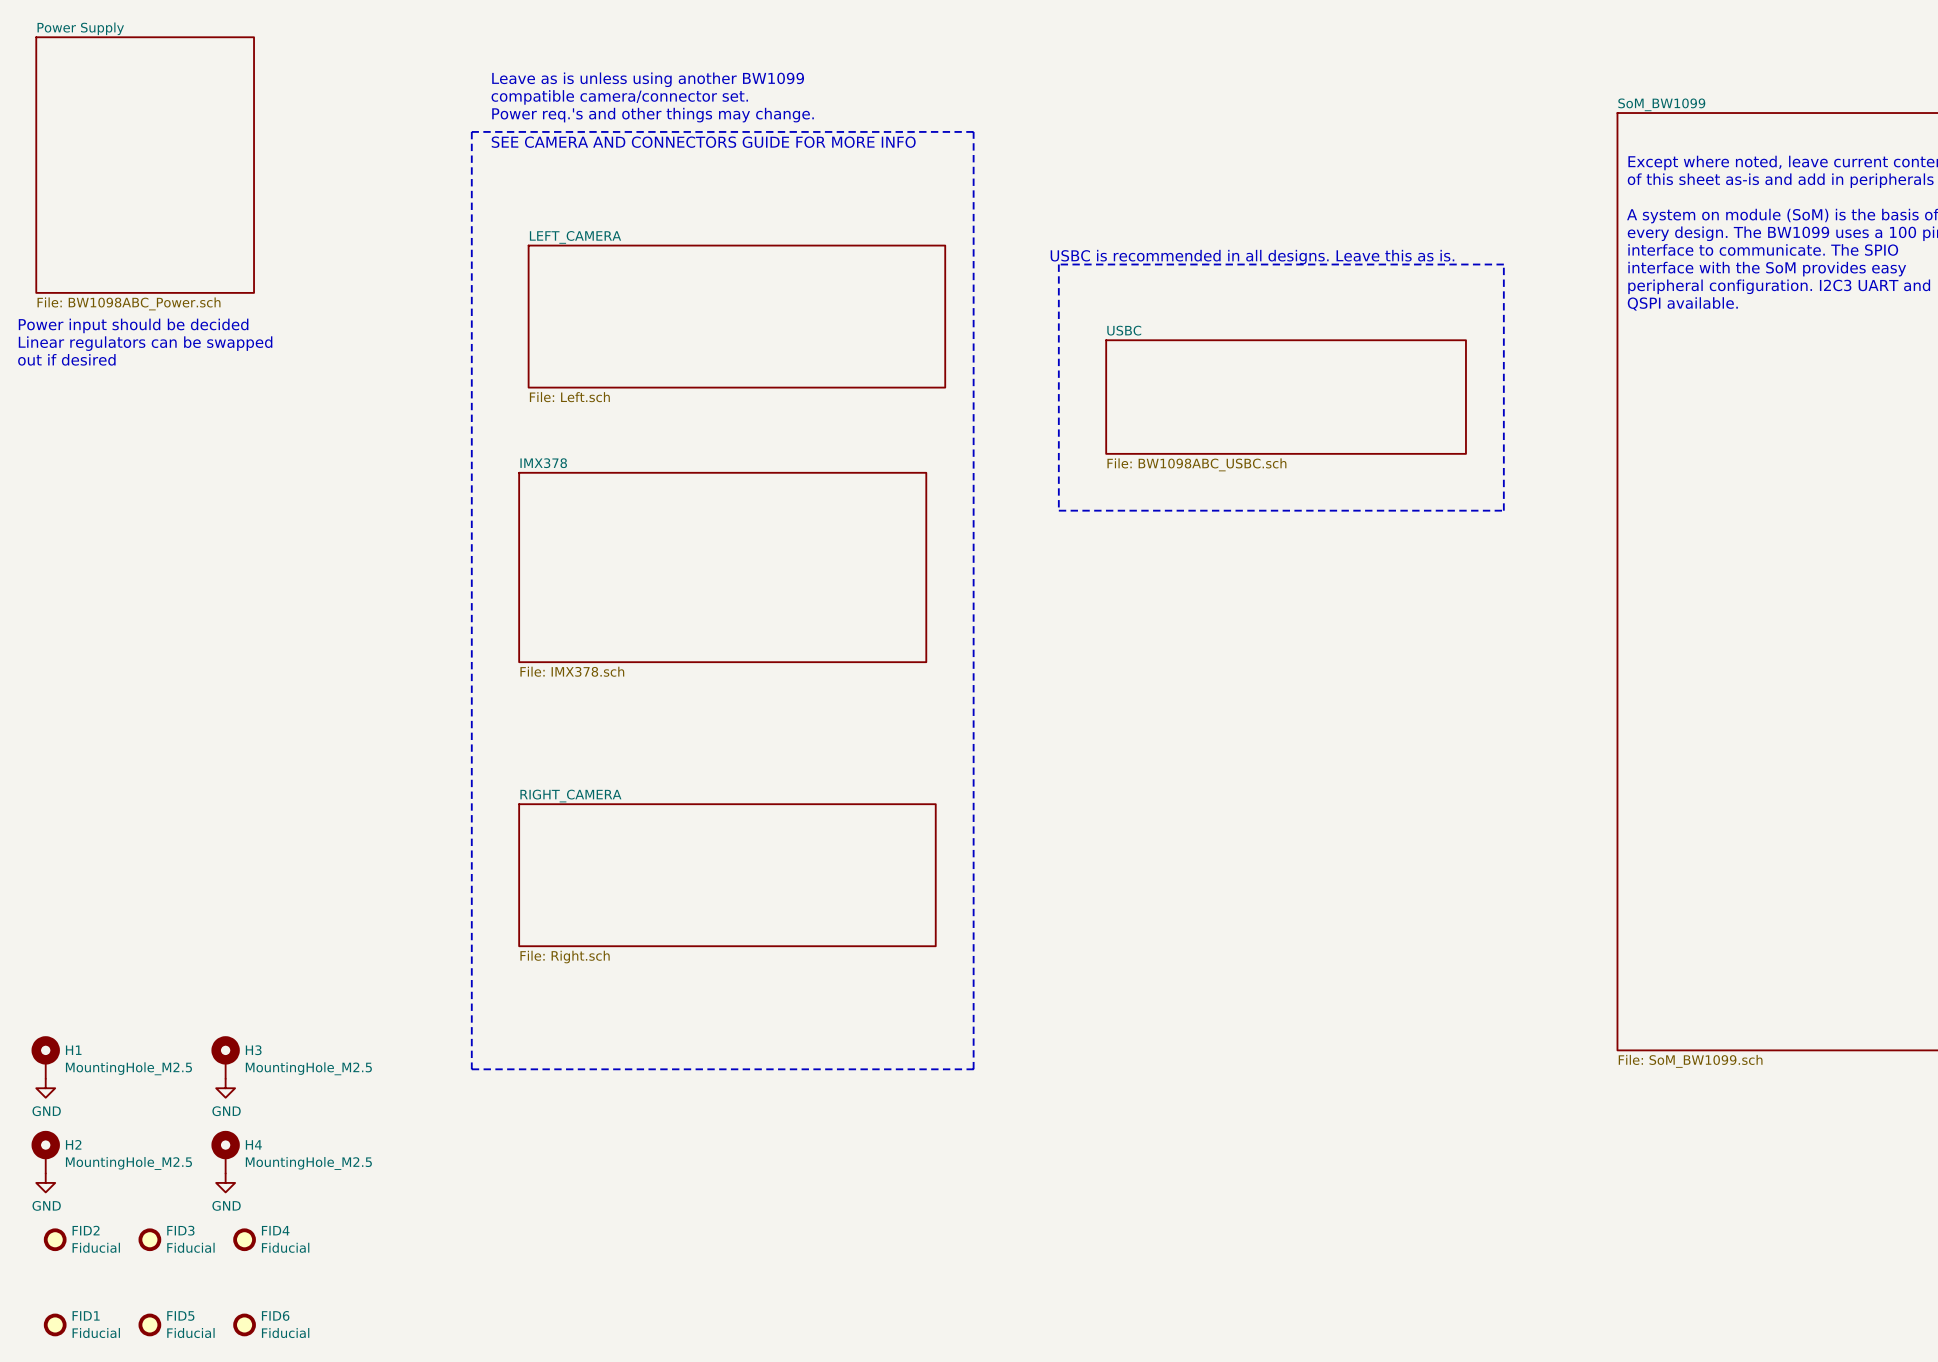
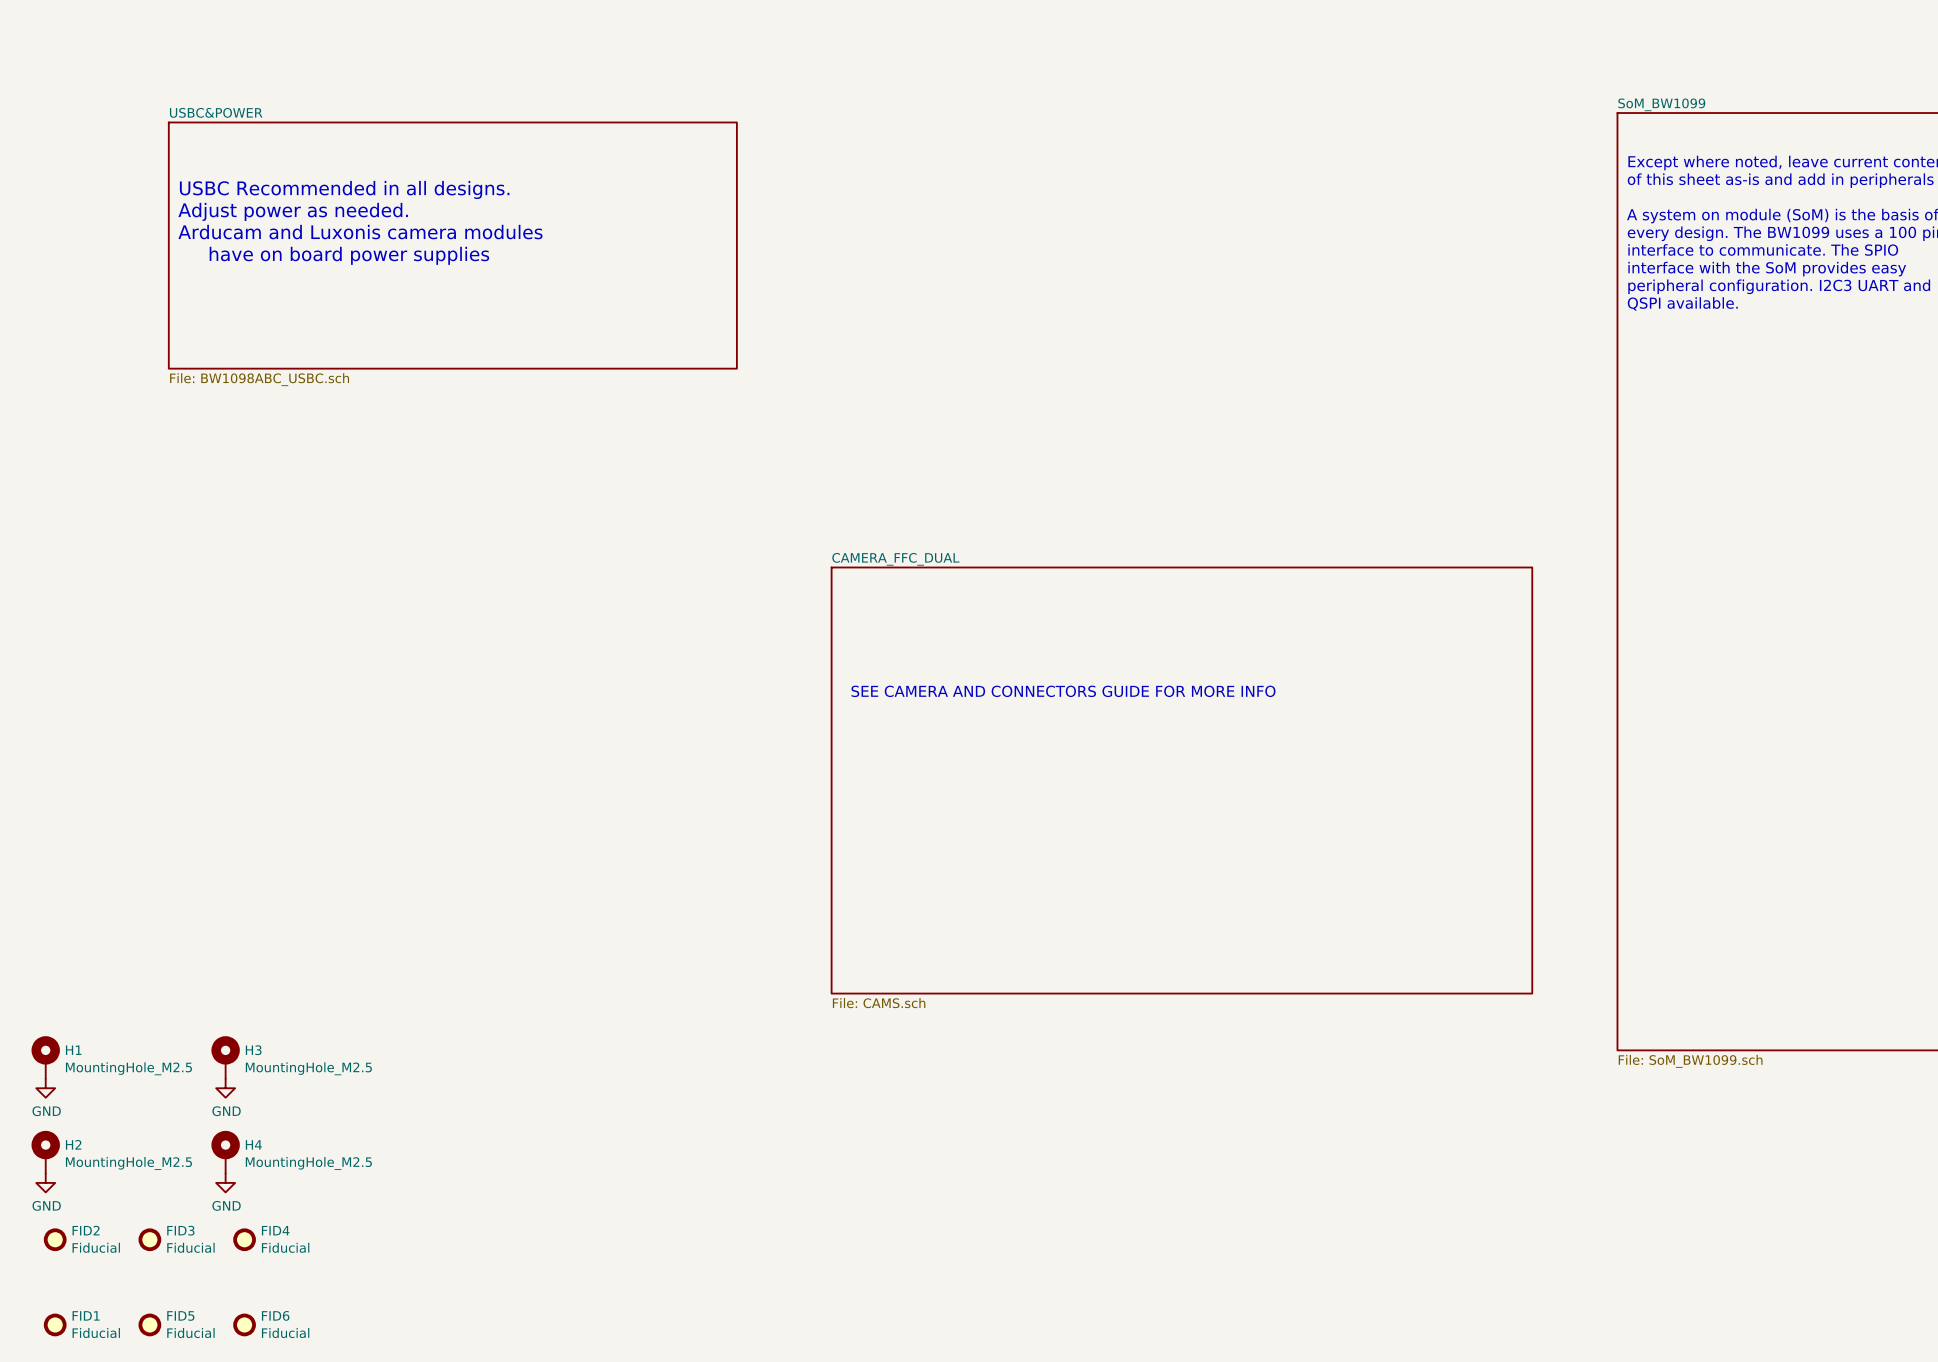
text: Leave as is unless using another BW1099 (648, 79) -> none
text: compatible camera/connector set. (619, 97) -> none
text: Power req.'s and other things may change. (653, 115) -> none
line: (471, 131) (973, 131) (973, 1069) (471, 1069) (471, 131) -> none
text: SEE CAMERA AND CONNECTORS GUIDE FOR MORE INFO (703, 142) -> none
sheet Power Supply: File: BW1098ABC_Power.sch (145, 165) -> none
text: none -> USBC Recommended in all designs. (344, 189)
text: none -> Adjust power as needed. (293, 211)
text: none -> Arducam and Luxonis camera modules (360, 232)
sheet USBC&POWER: none -> File: BW1098ABC_USBC.sch (452, 245)
text: none -> have on board power supplies (349, 255)
text: USBC is recommended in all designs. Leave this as is. (1252, 257) -> none
line: (1058, 264) (1503, 264) (1503, 510) (1058, 510) (1058, 264) -> none
sheet LEFT_CAMERA: File: Left.sch (736, 316) -> none
text: Power input should be decided (133, 325) -> none
text: Linear regulators can be swapped (145, 343) -> none
text: out if desired (66, 359) -> none
sheet USBC: File: BW1098ABC_USBC.sch (1286, 397) -> none
sheet IMX378: File: IMX378.sch (722, 567) -> none
text: none -> SEE CAMERA AND CONNECTORS GUIDE FOR MORE INFO (1063, 691)
sheet CAMERA_FFC_DUAL: none -> File: CAMS.sch (1181, 780)
sheet RIGHT_CAMERA: File: Right.sch (727, 875) -> none

